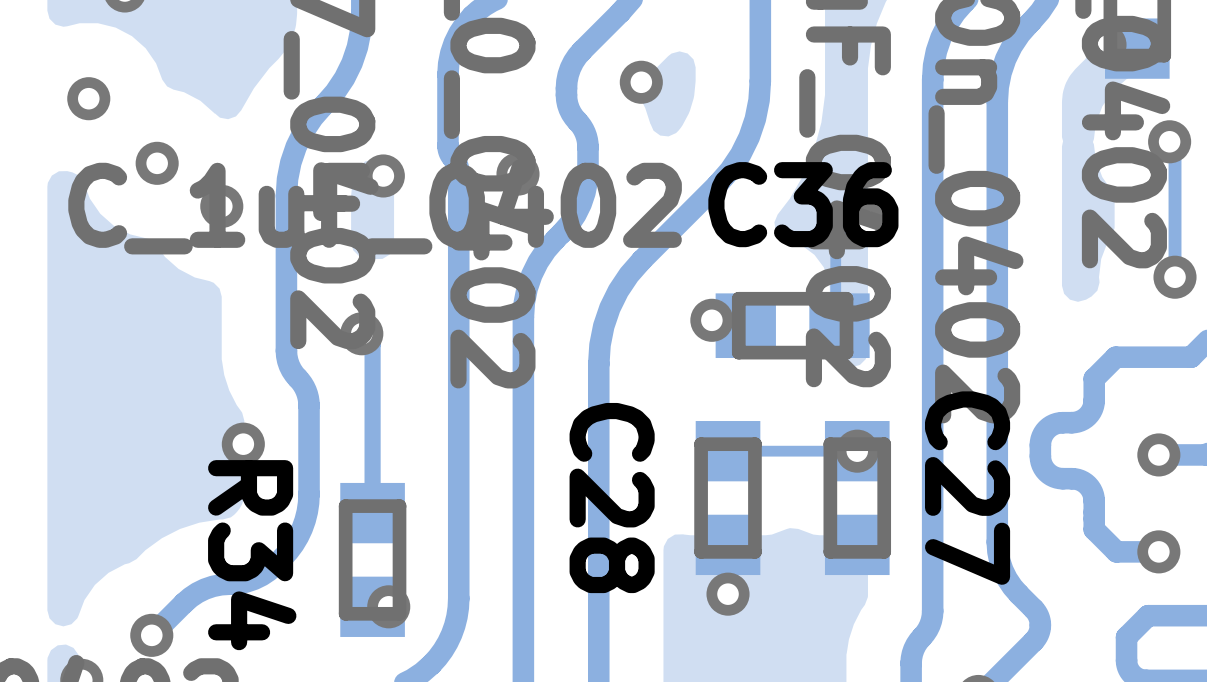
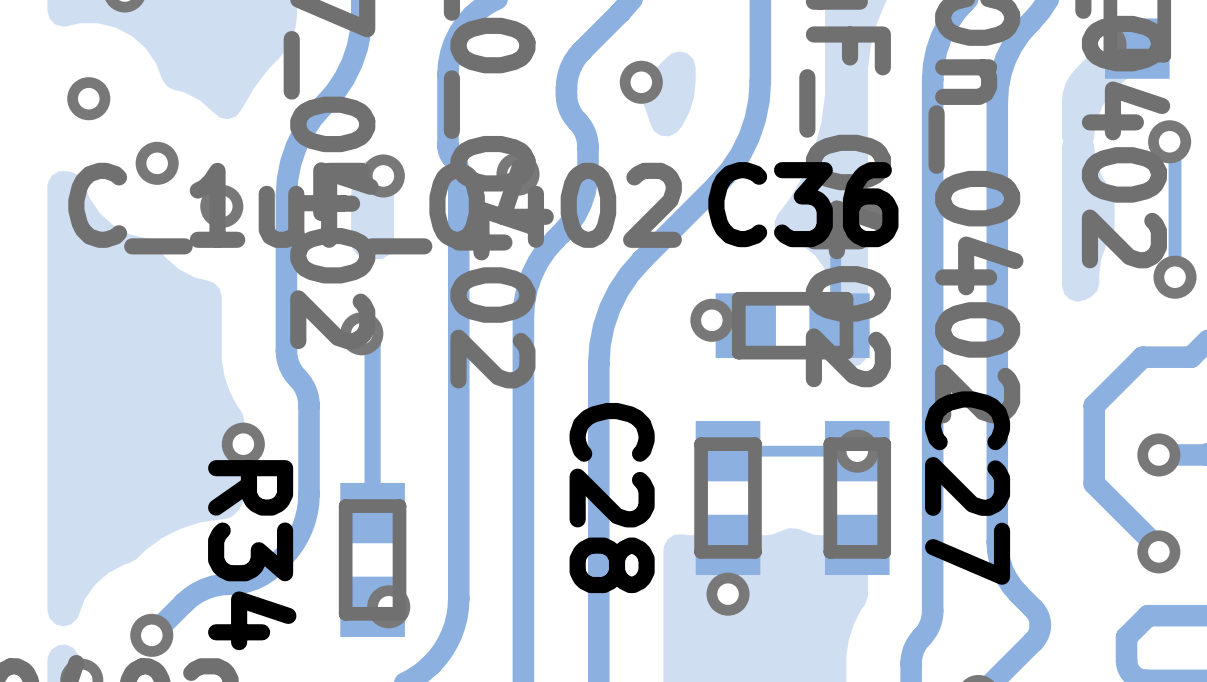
track: (1142, 357) (1115, 357) (1094, 378) (1094, 403) (1087, 416) (1077, 421) (1054, 424) (1045, 431) (1040, 442) (1040, 459) (1045, 469) (1051, 475) (1059, 478) (1077, 479) (1089, 487) (1094, 498) (1094, 529) (1116, 551) (1158, 551) -> (1142, 357) (1094, 405) (1094, 483) (1158, 548) (1158, 551)

